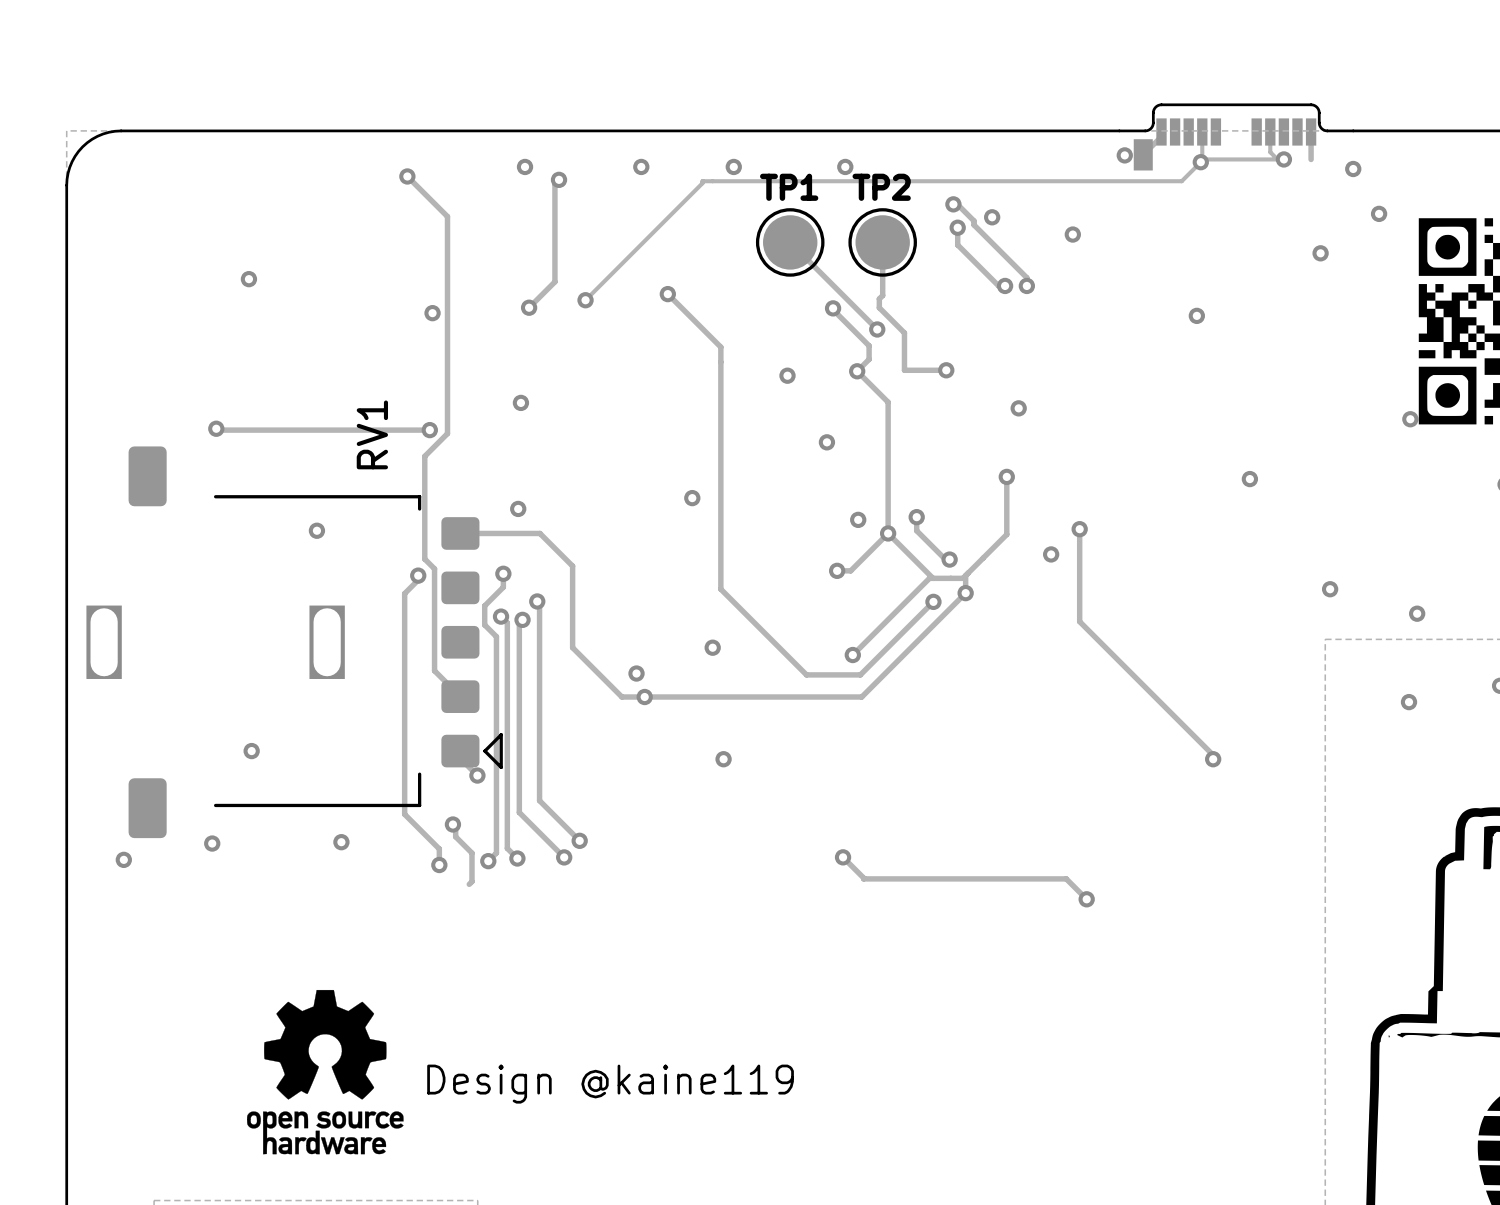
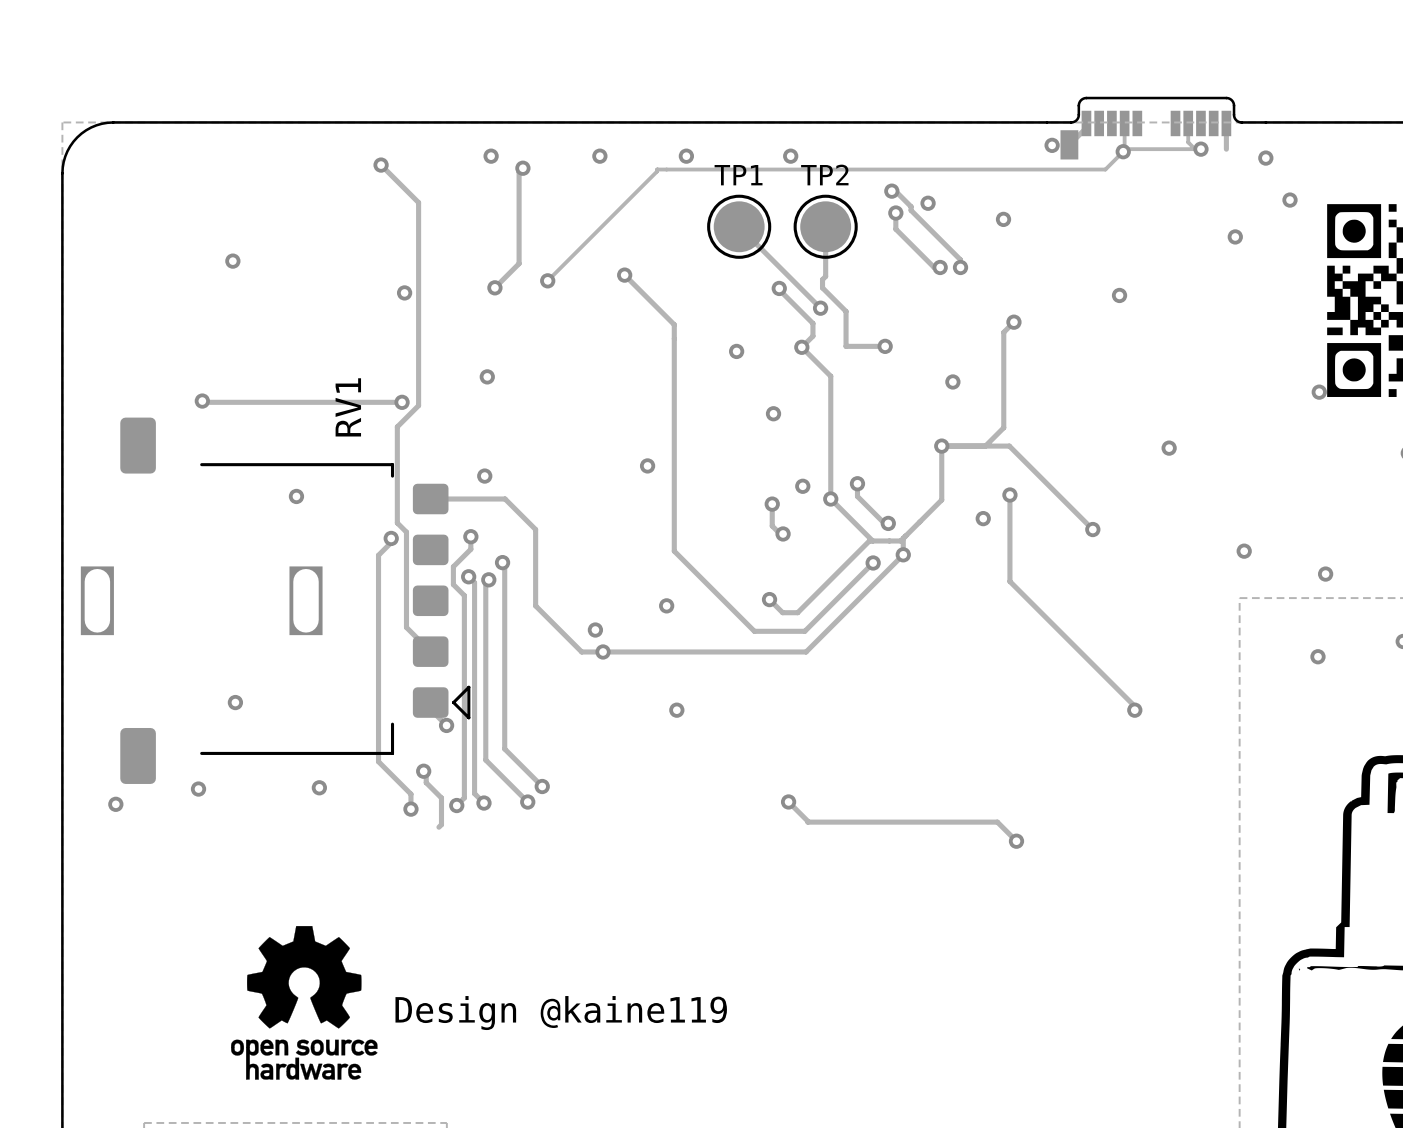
track: none -> (1013, 322) (1003, 332) (1003, 427) (985, 446)
via: none -> (1013, 322)
track: none -> (941, 446) (1009, 446) (1092, 529)
track: (888, 533) (850, 570) (837, 570) -> none
track: none -> (772, 504) (772, 526) (779, 533)
via: none -> (772, 504)
via: none -> (1092, 529)
track: none -> (769, 599) (782, 612) (797, 612)
via position: (852, 655) -> (769, 599)

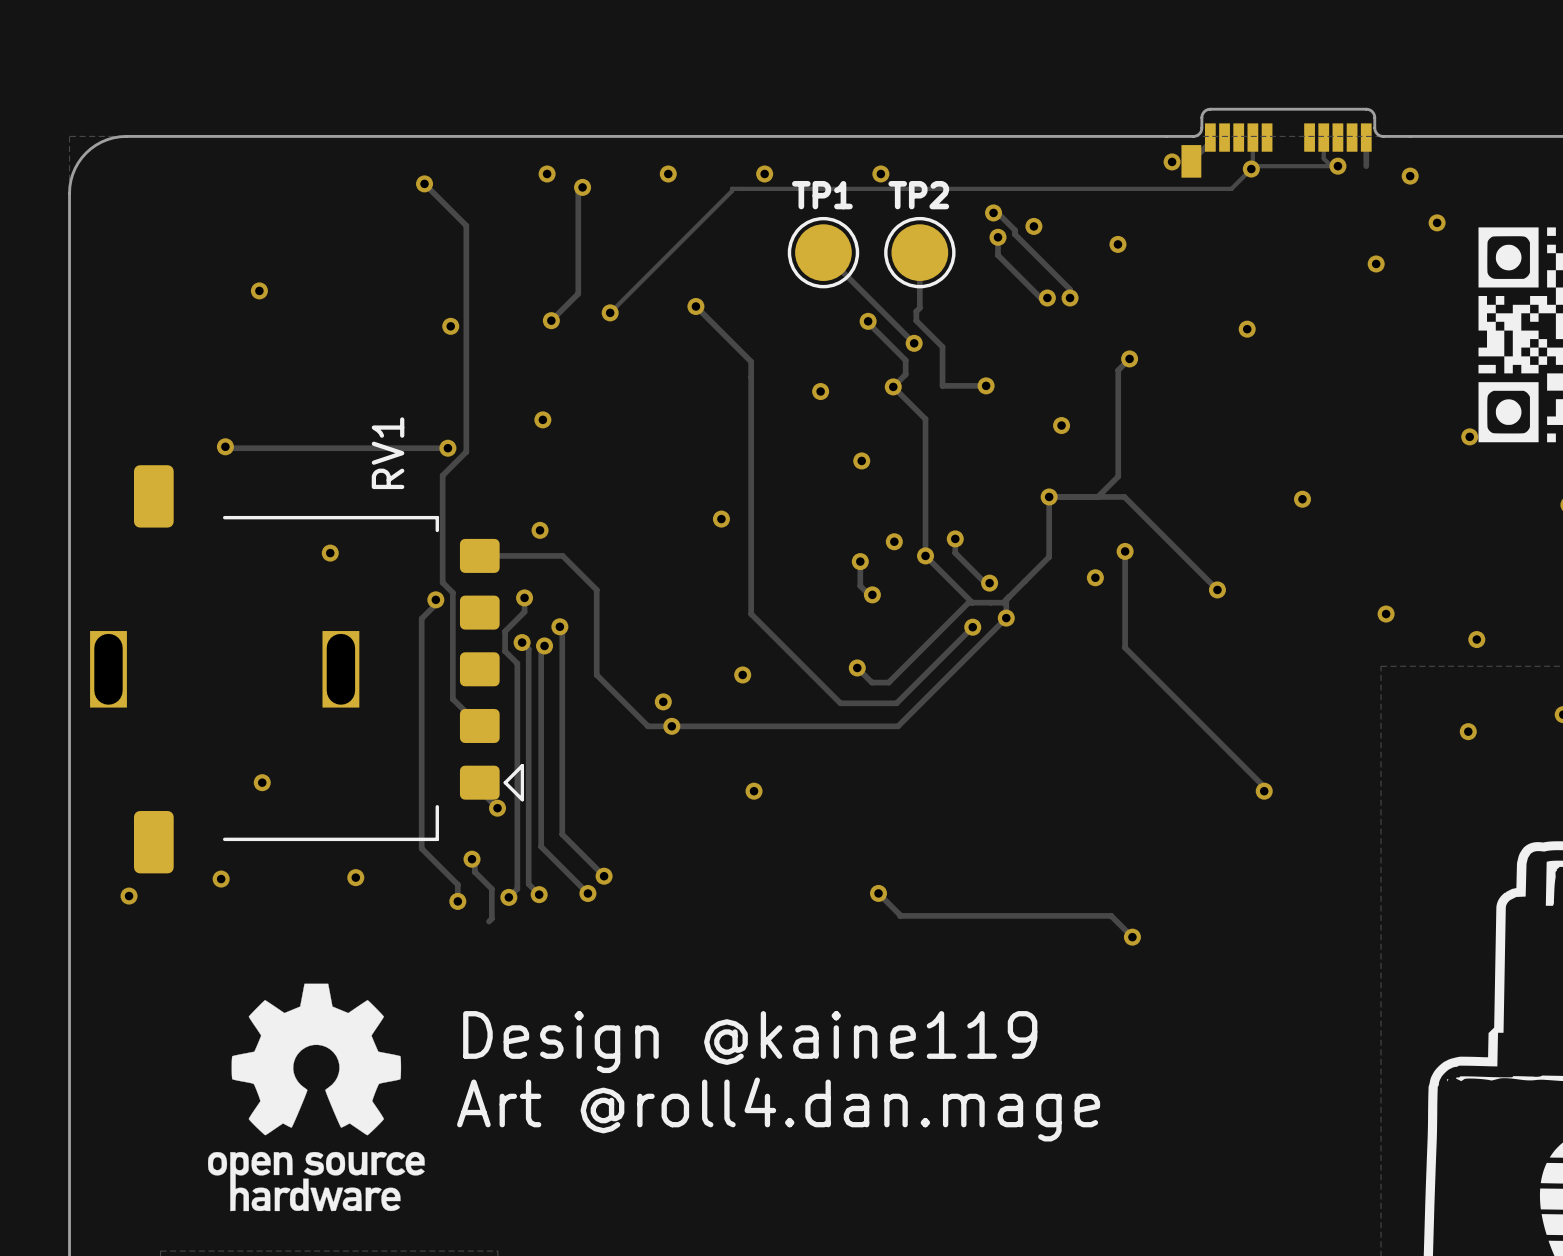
drawing: none -> [207, 983, 425, 1212]
drawing: [231, 926, 378, 1080] -> none
text: none -> Design @kaine119 (750, 1042)
text: Design @kaine119 (561, 1013) -> Art @roll4.dan.mage (778, 1109)

